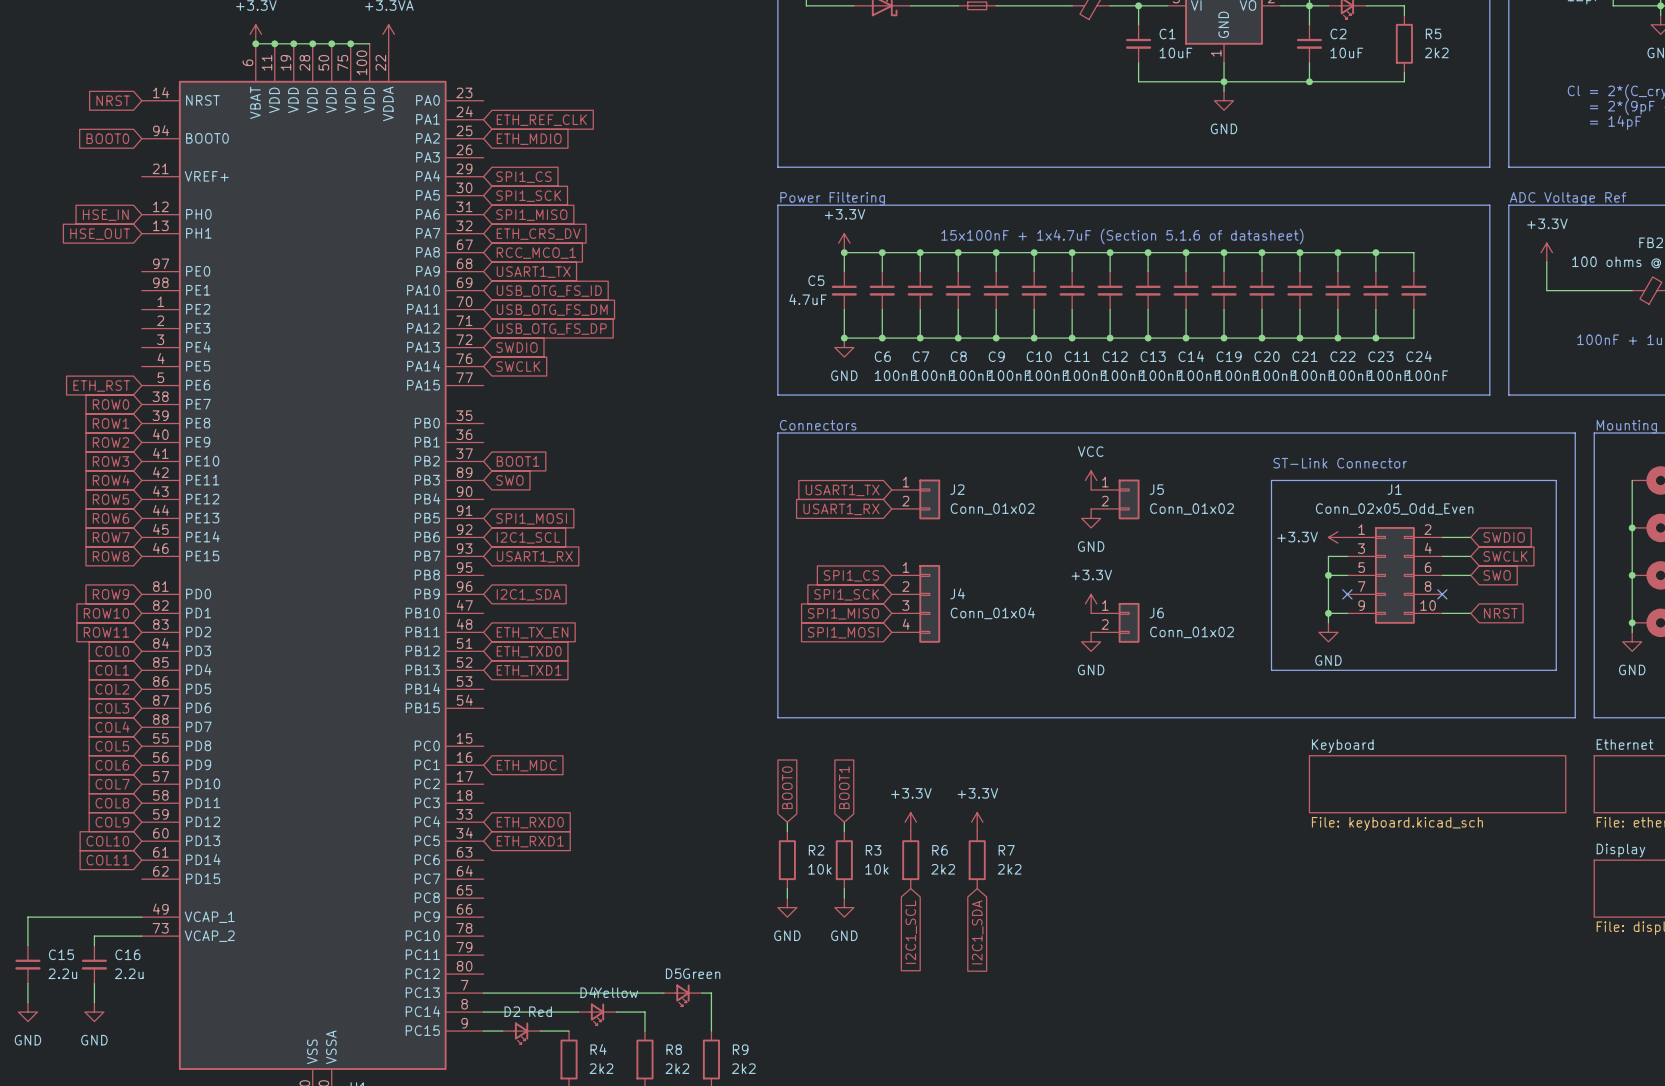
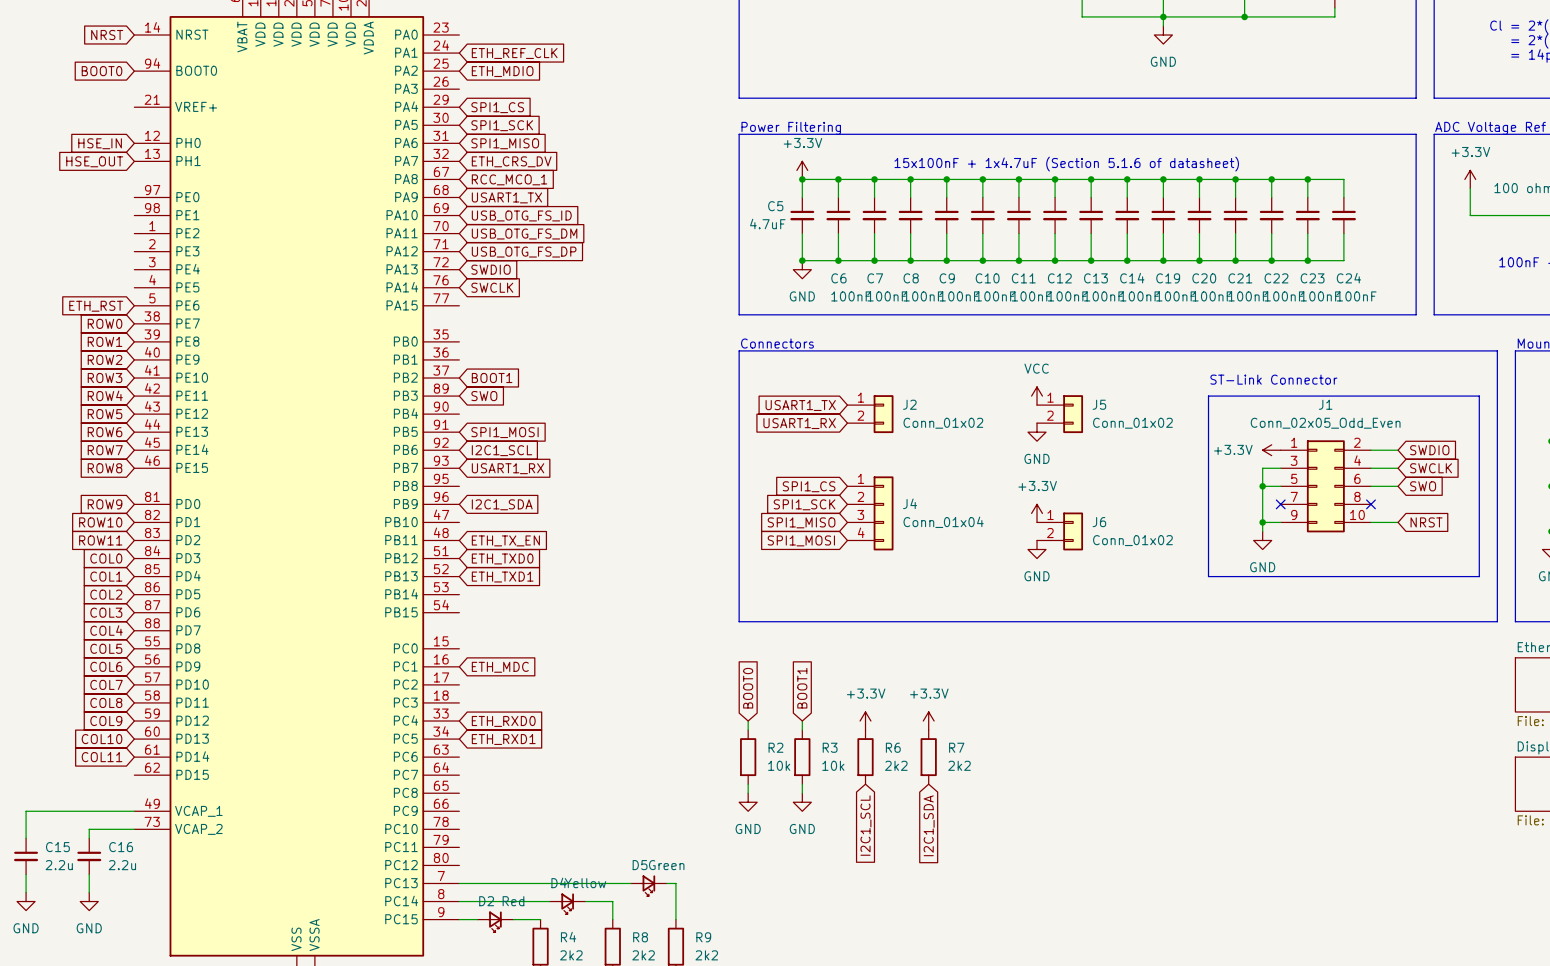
sheet Keyboard: File: keyboard.kicad_sch (1437, 784) -> none

